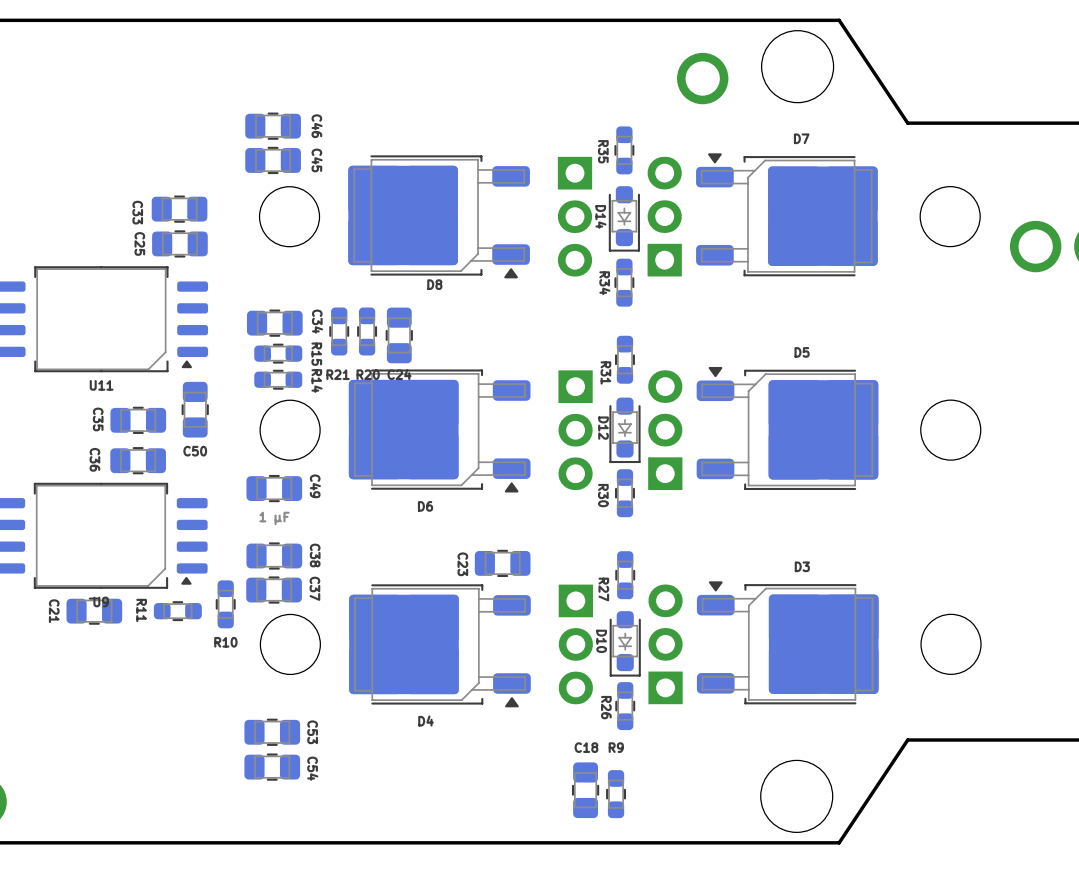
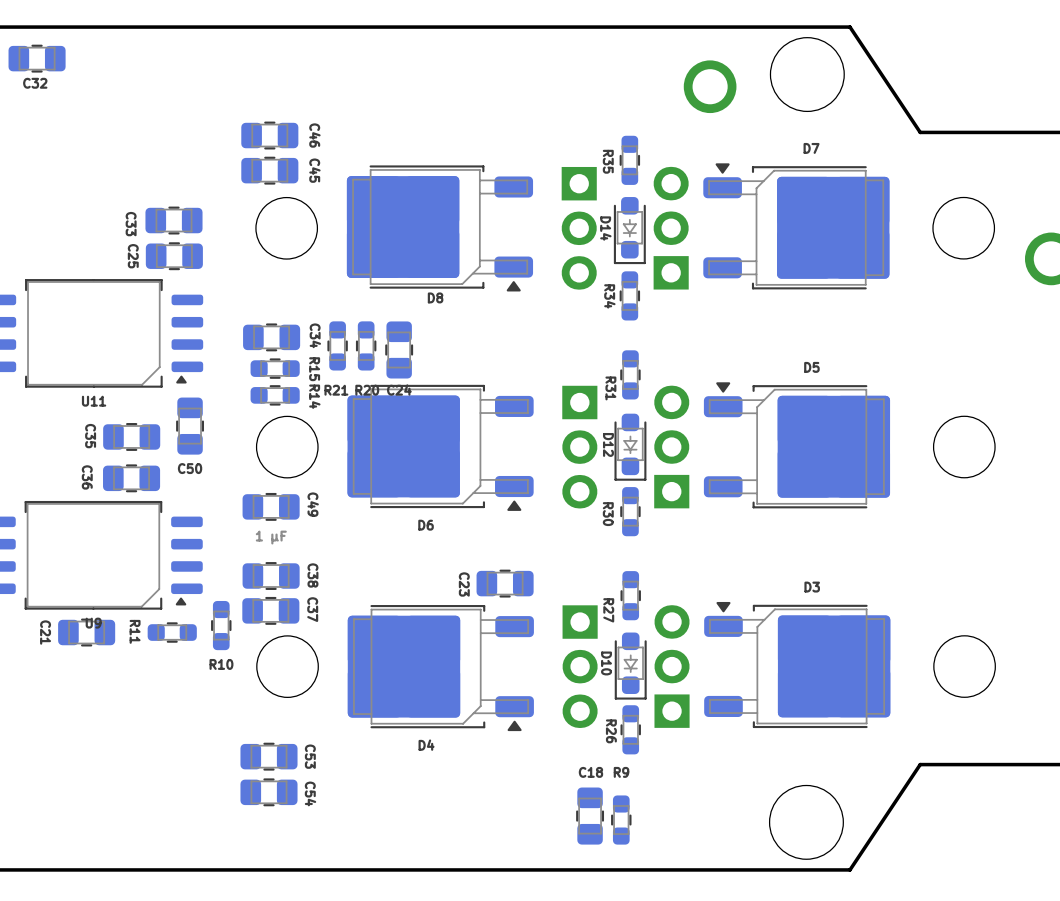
C32: none -> (37, 58)

